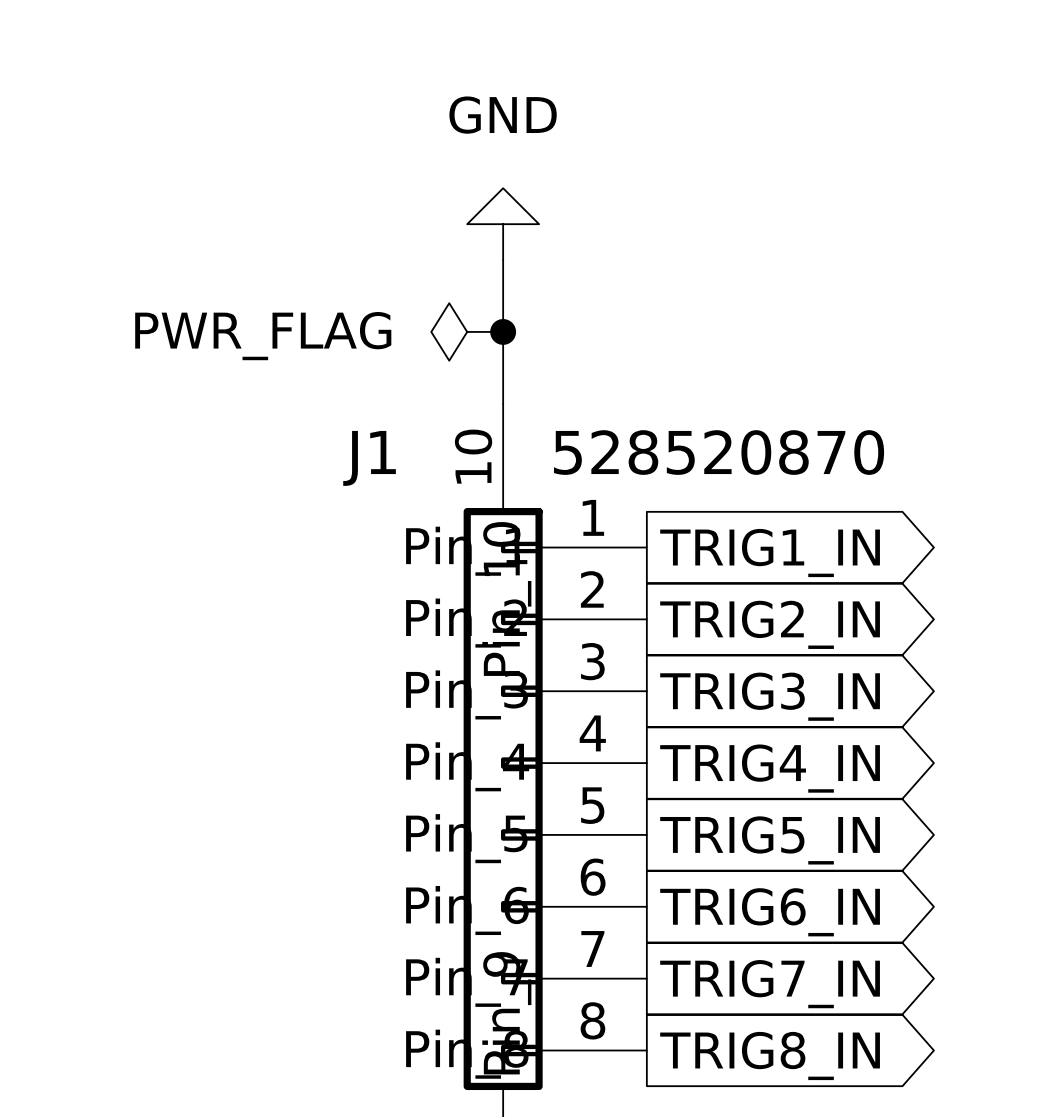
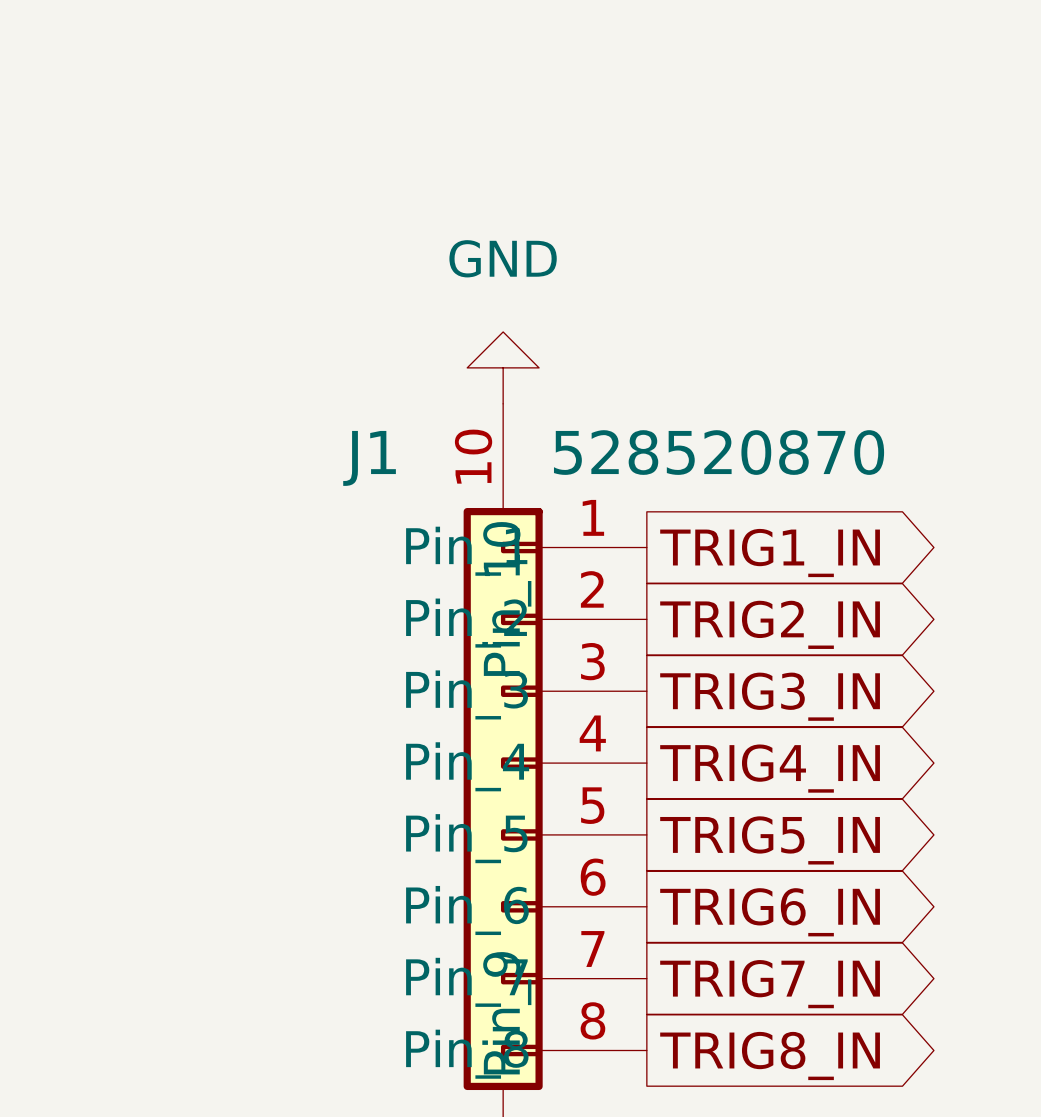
power symbol position: GND (503, 224) -> GND (503, 367)
wire: (503, 260) (503, 403) -> none
power symbol: PWR_FLAG (467, 331) -> none
junction: (503, 331) -> none

